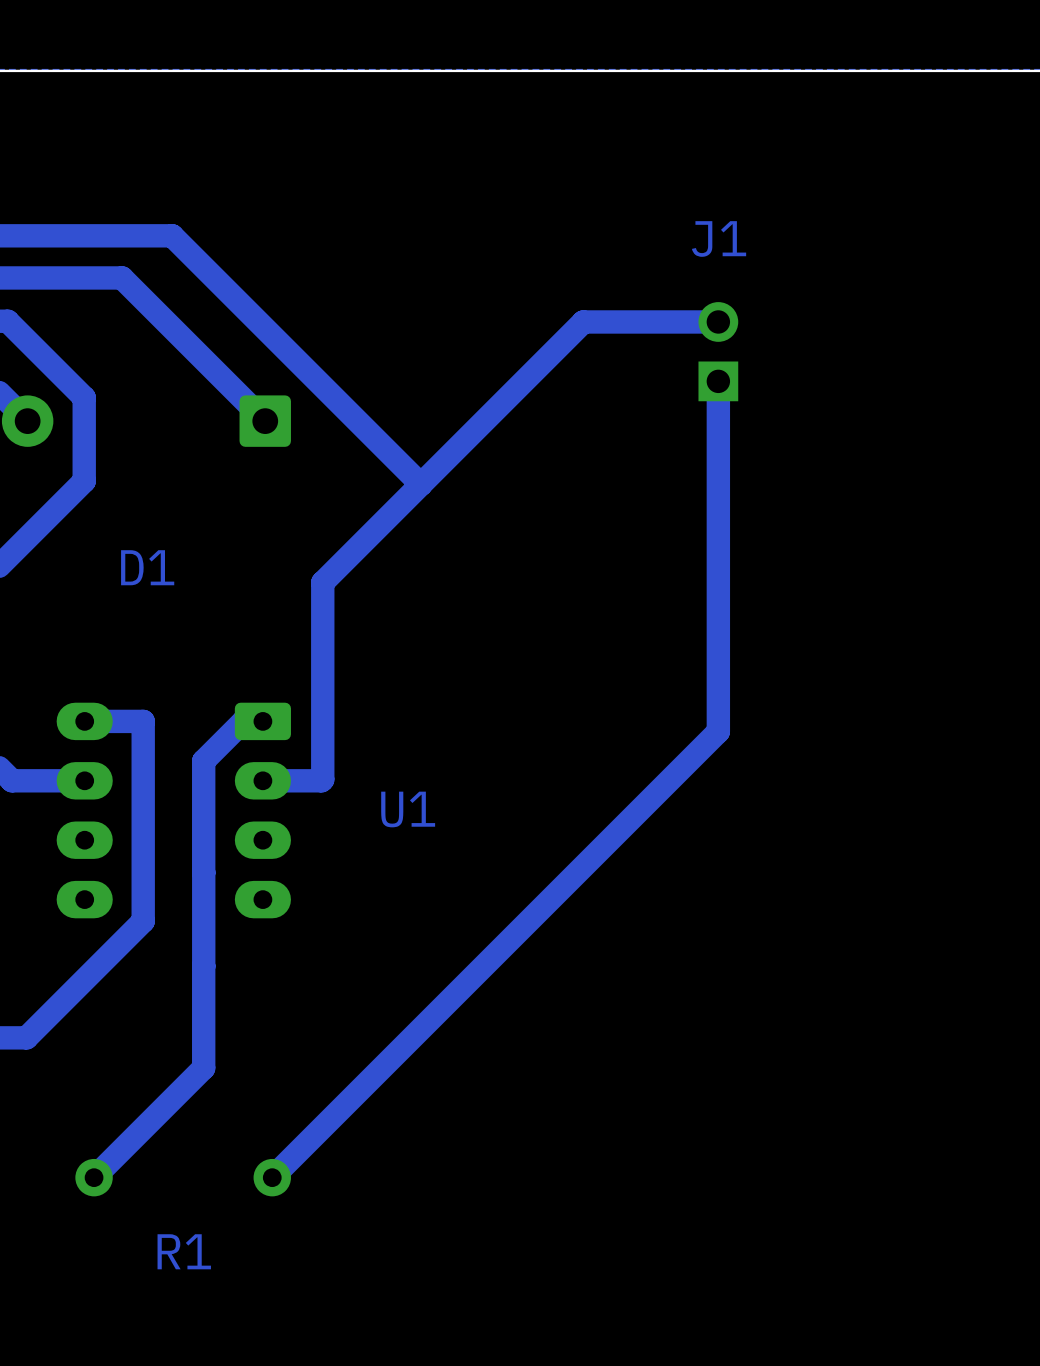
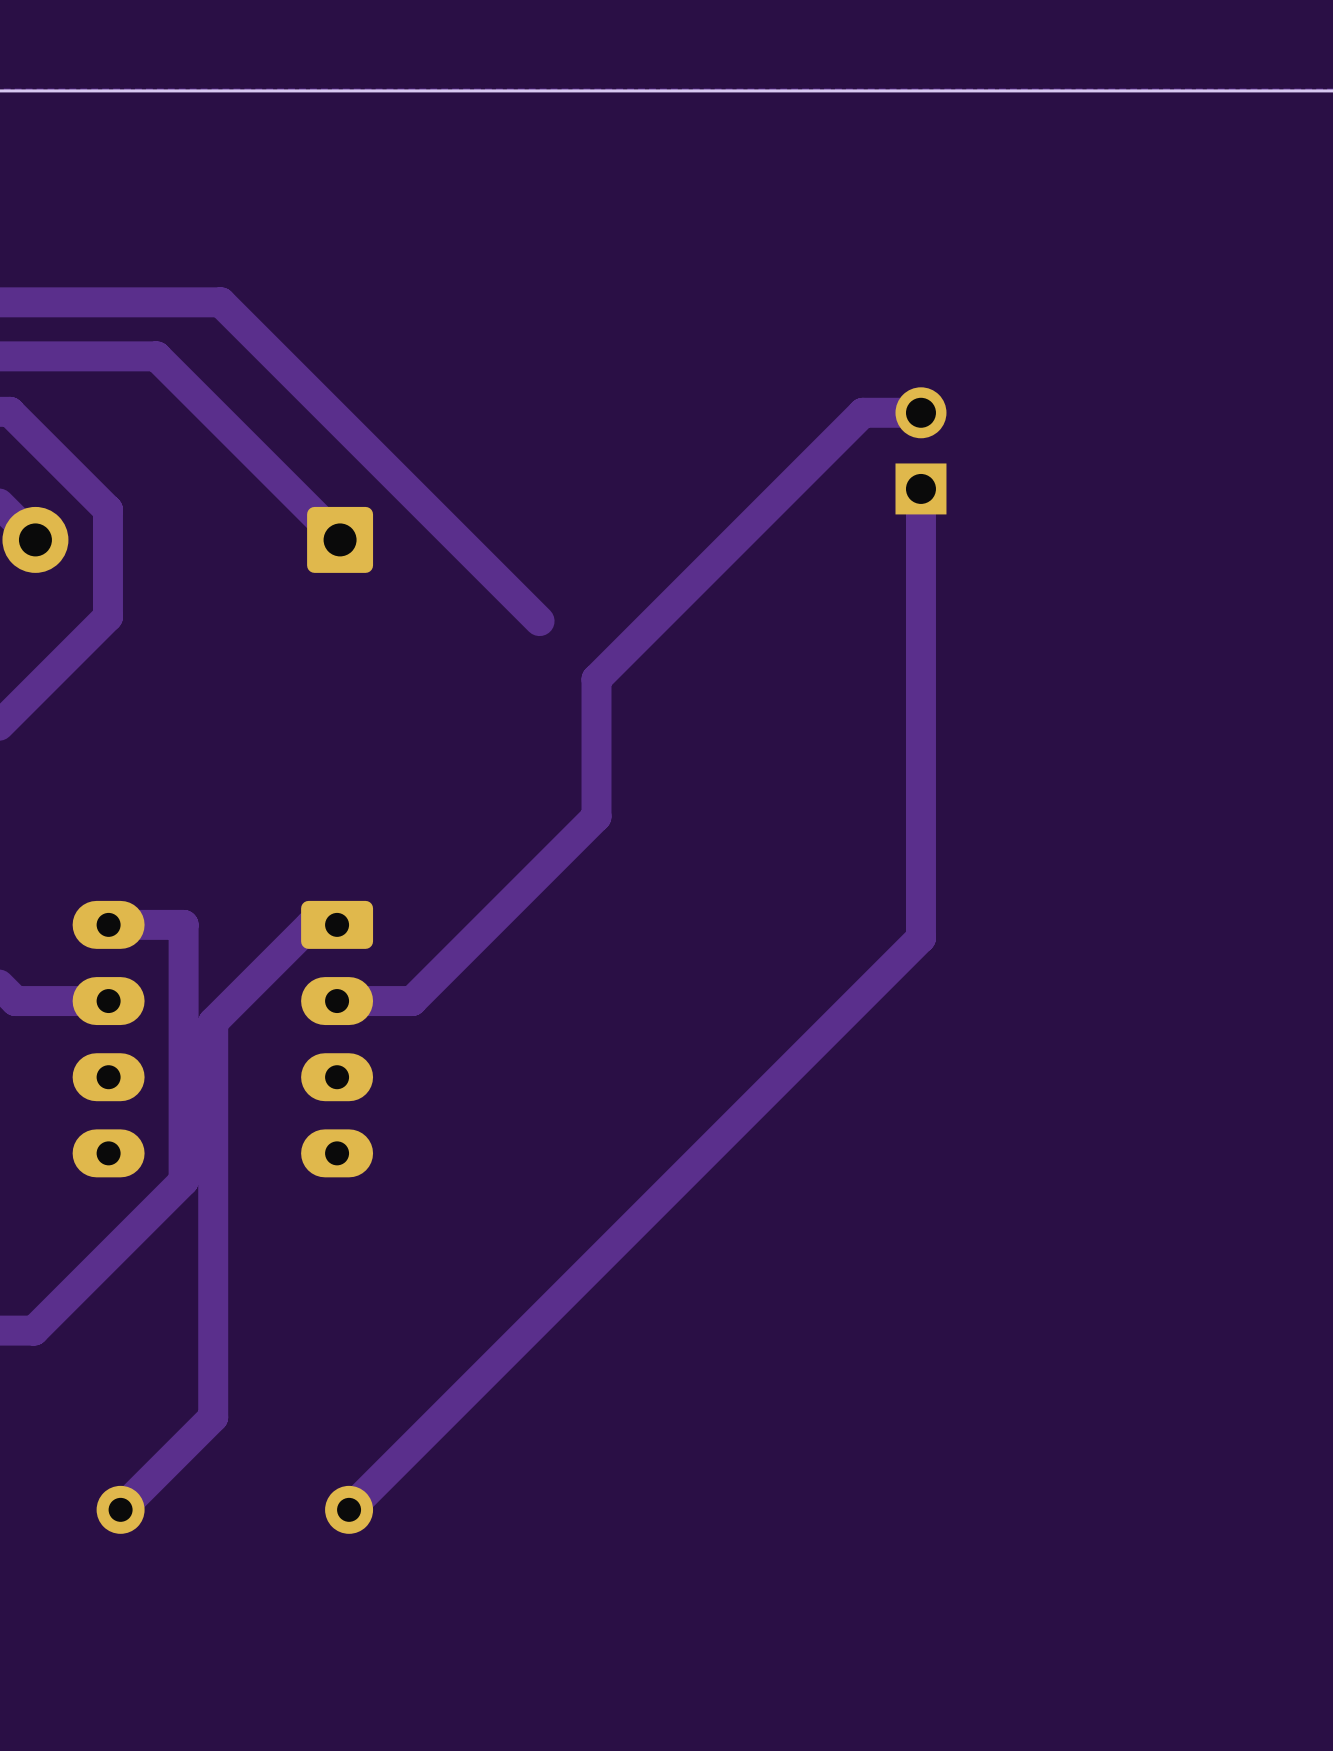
text: J1 (719, 238) -> none
track: (673, 321) (583, 321) (322, 582) (322, 779) -> (862, 412) (596, 679) (596, 816) (413, 999)
text: D1 (147, 567) -> none
track: (243, 721) (203, 761) (203, 1068) (166, 1105) -> (312, 924) (213, 1022) (213, 1417)
text: U1 (408, 809) -> none
text: R1 (184, 1251) -> none

